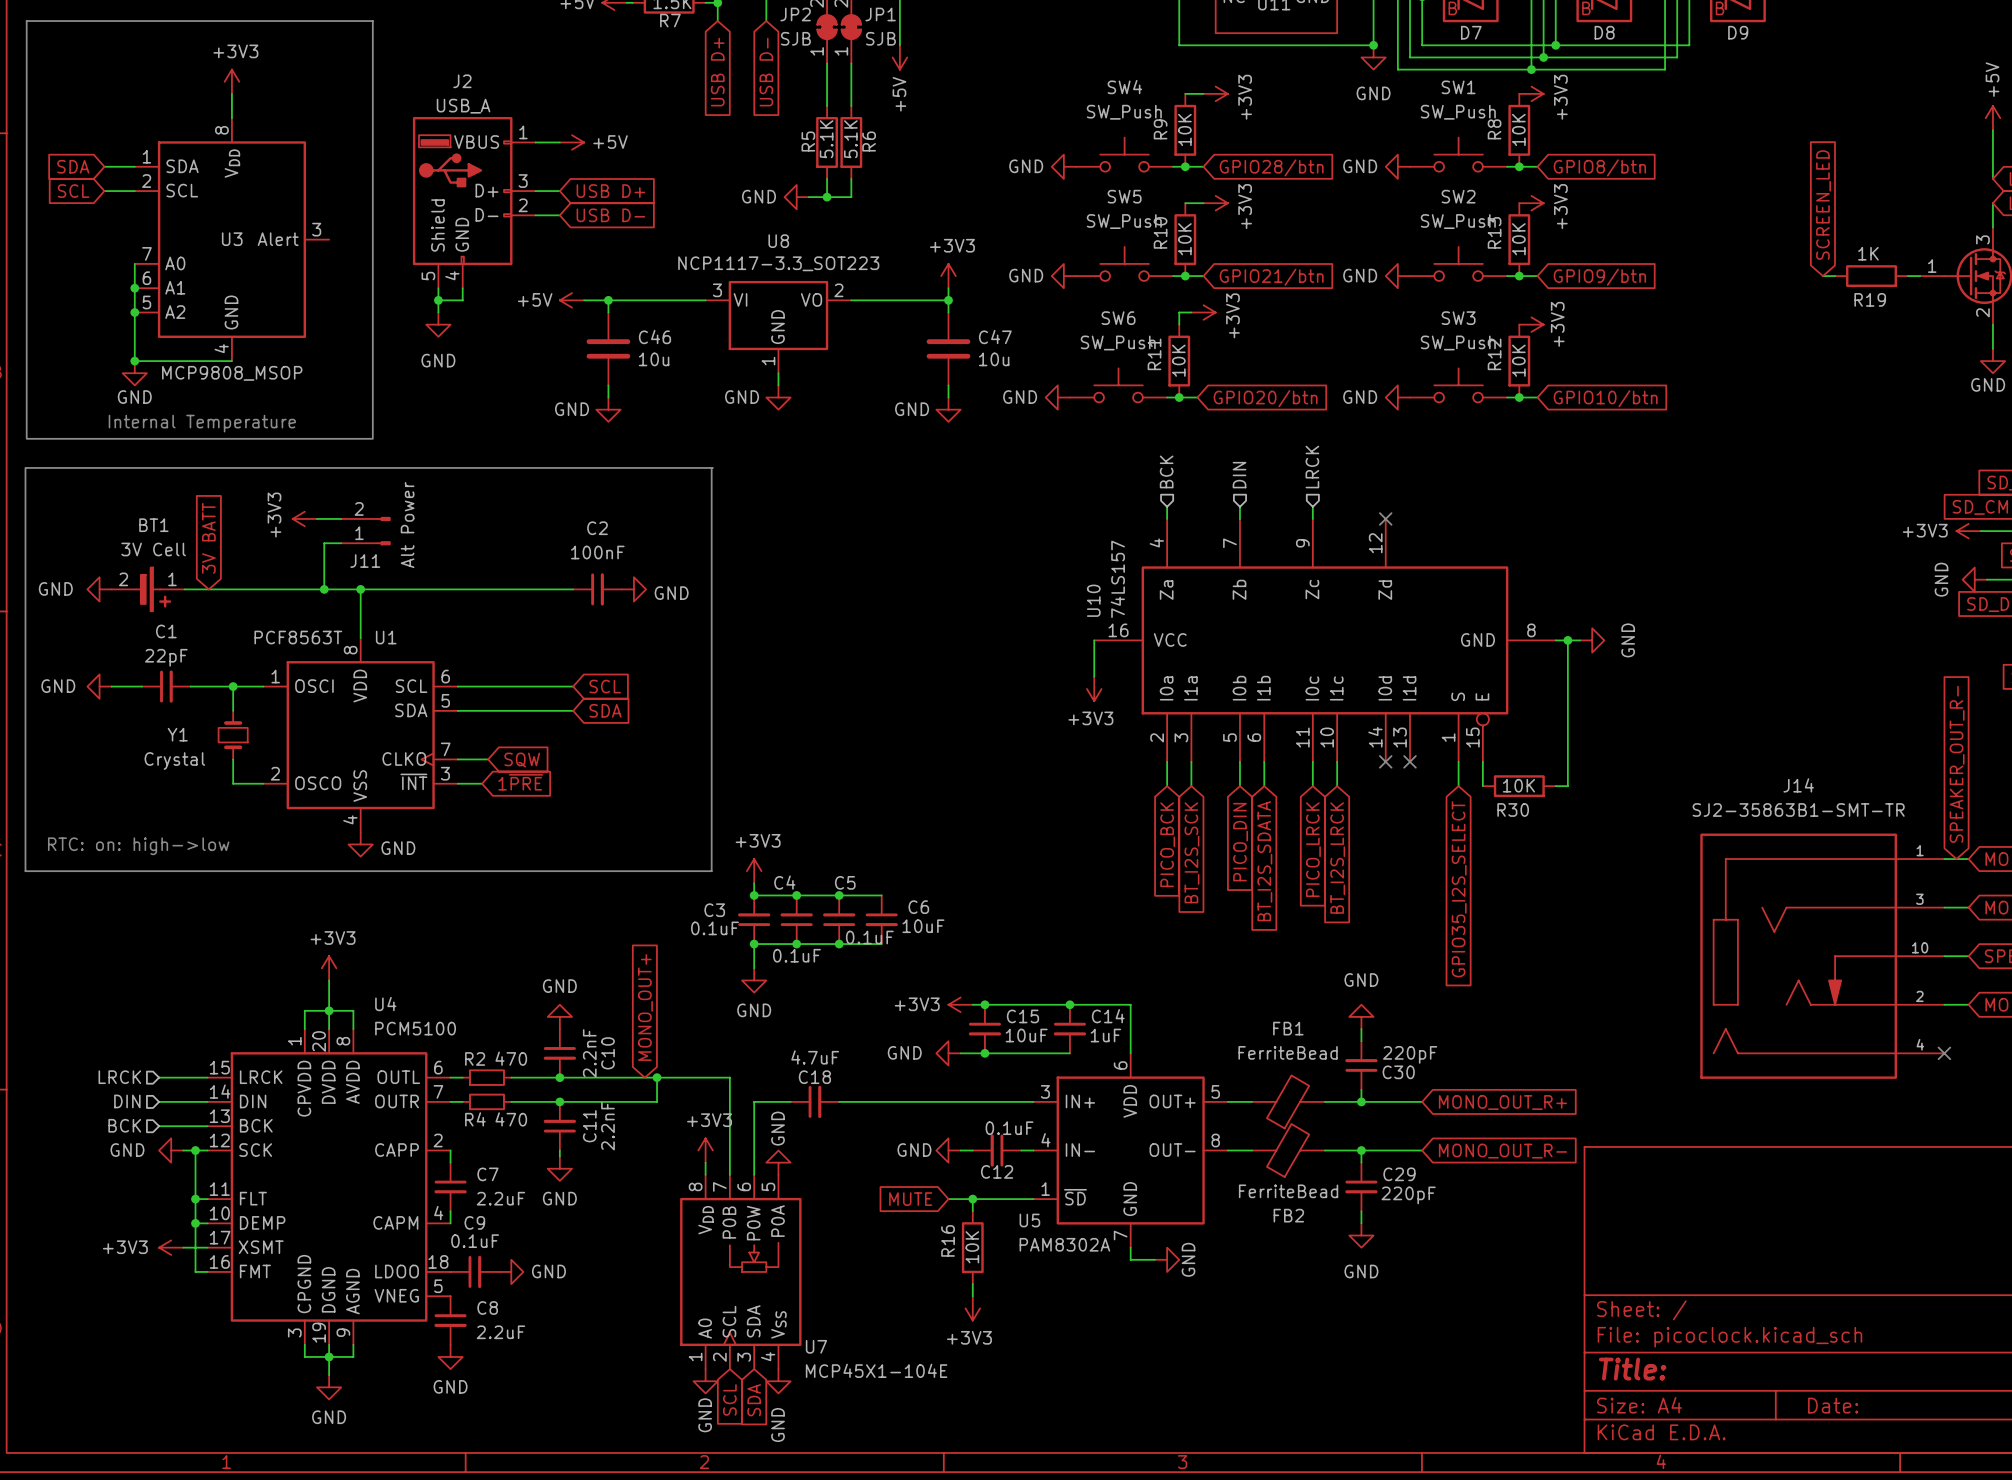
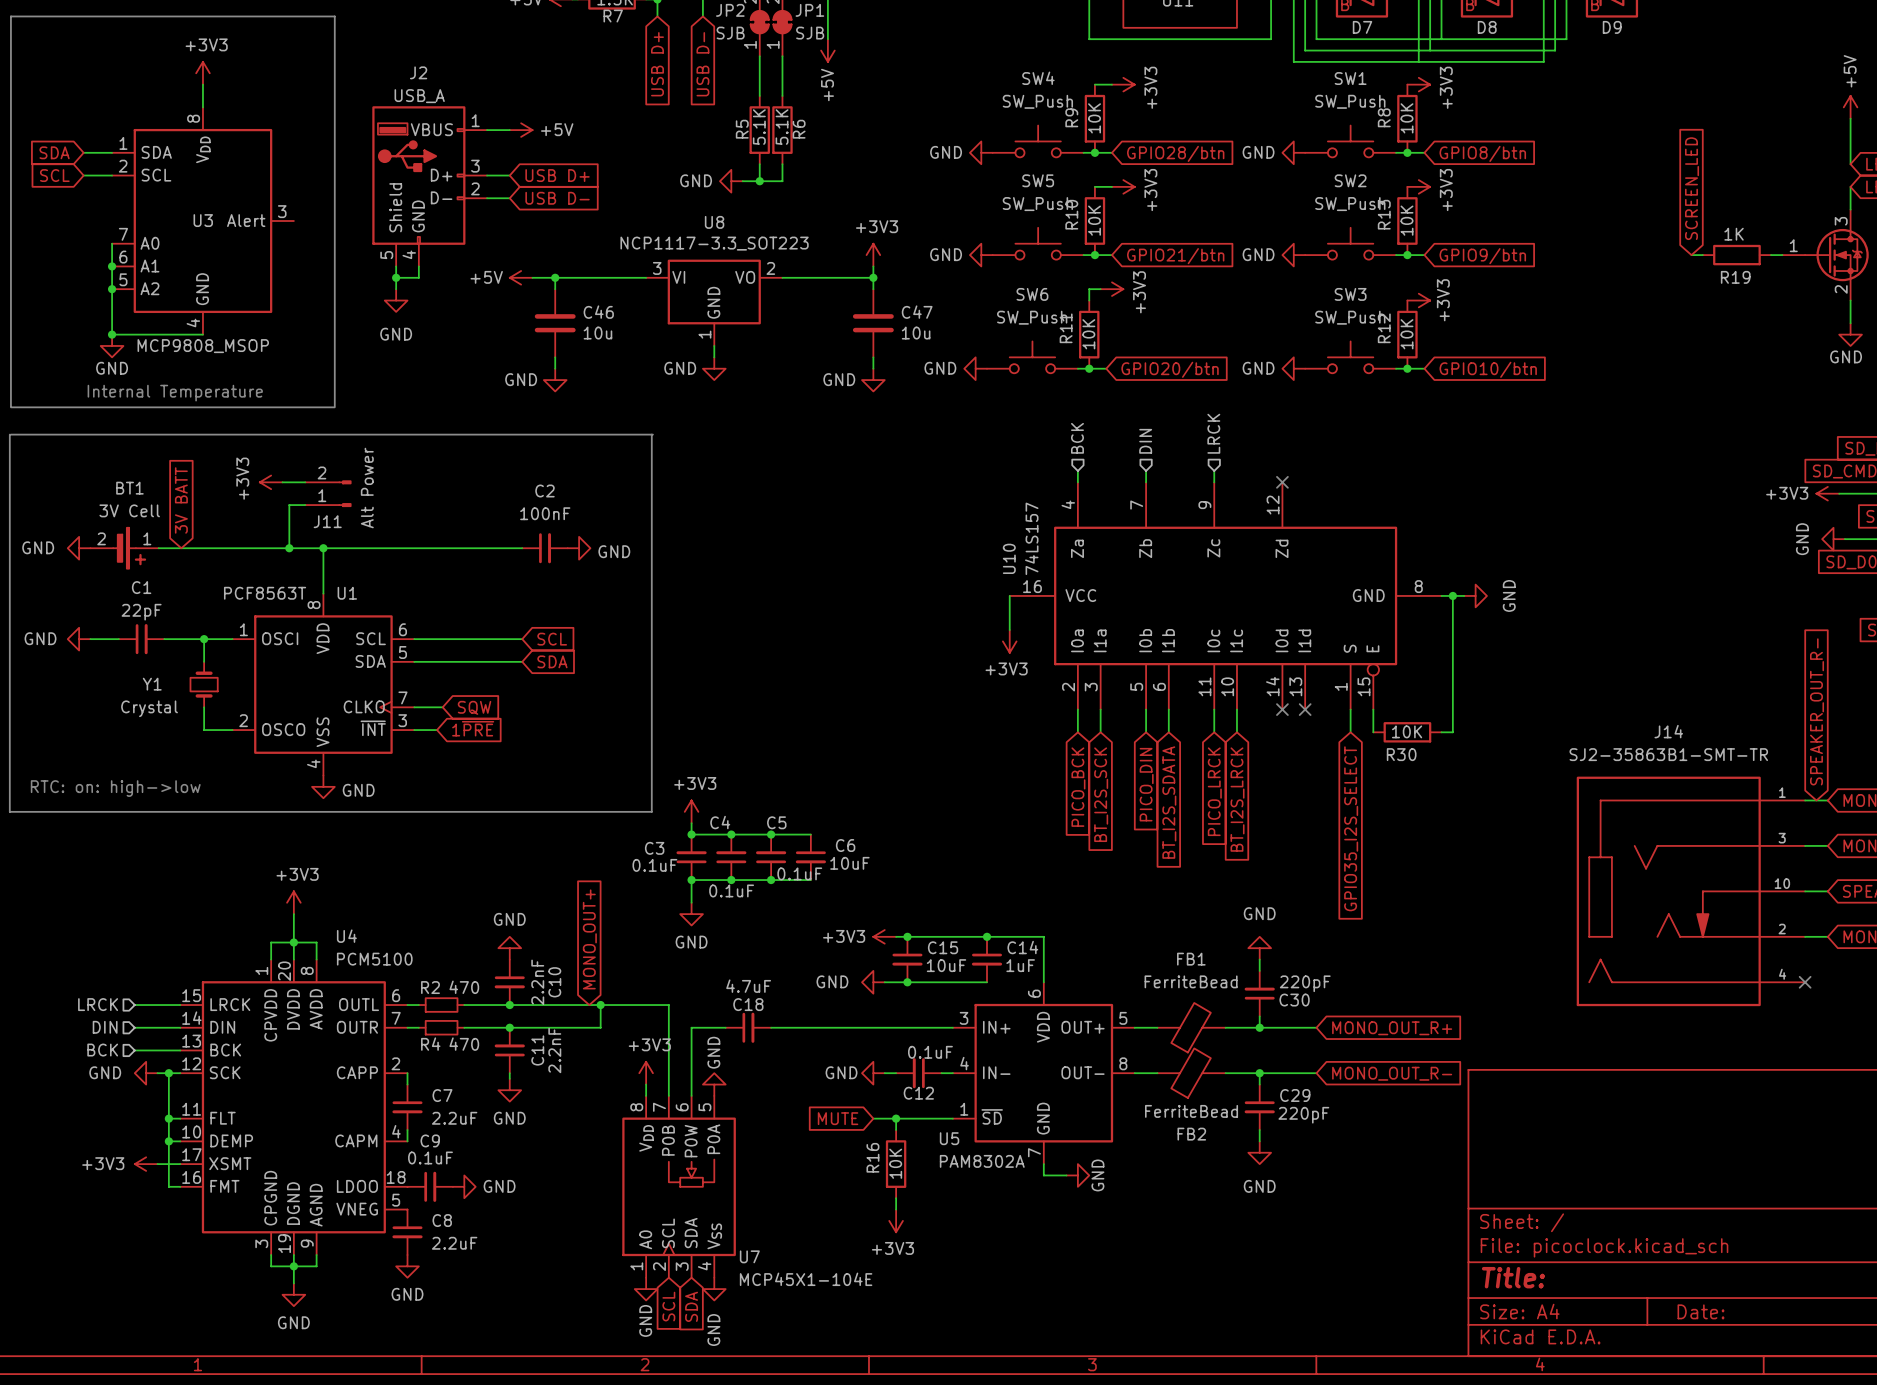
junction: (1373, 45) -> none
junction: (1555, 45) -> none
power symbol: GND (1373, 57) -> none
junction: (1543, 57) -> none
junction: (1531, 69) -> none

